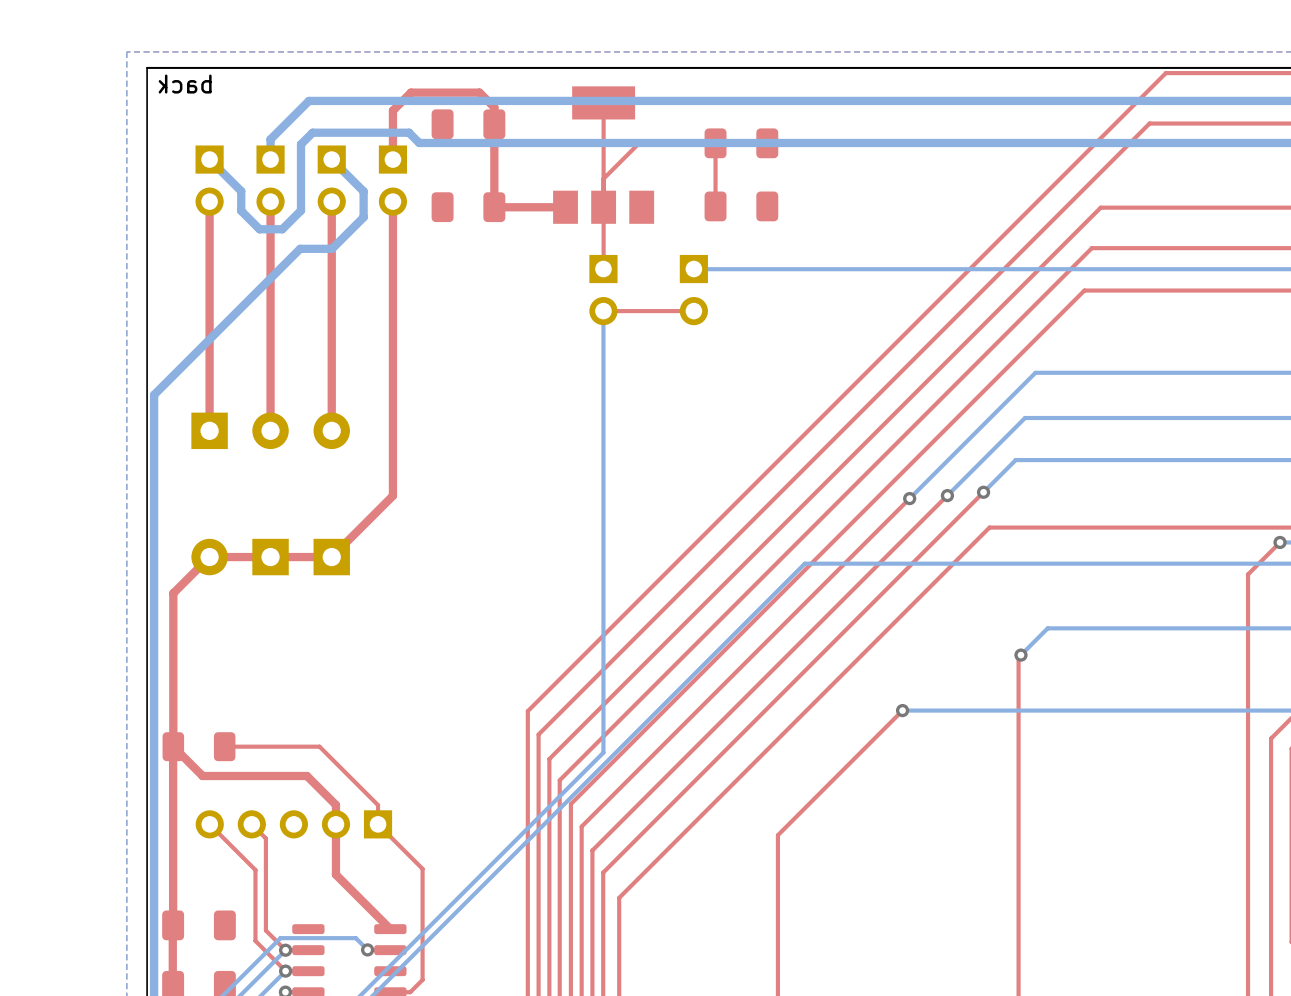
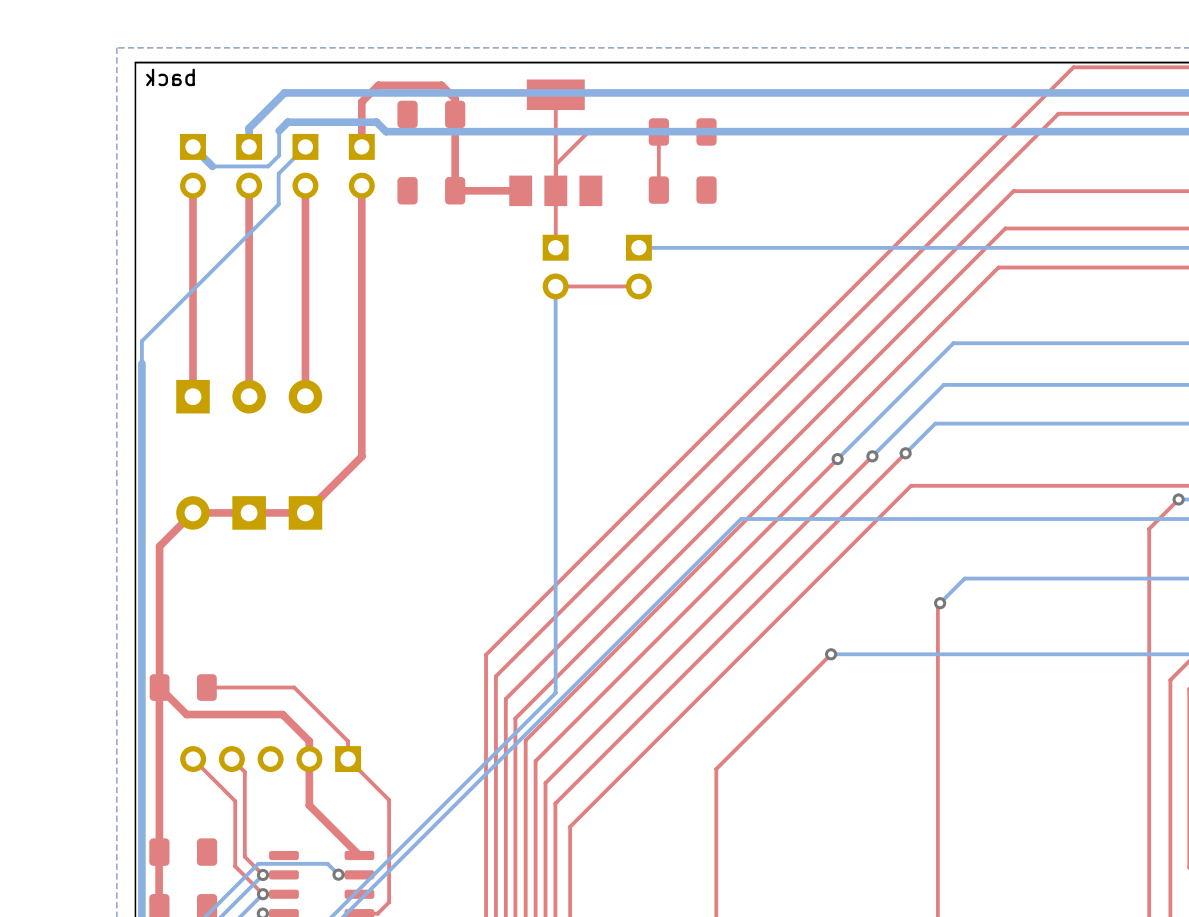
bottom track: (303, 142) (301, 144) (301, 210) (282, 229) (259, 229) (241, 210) (241, 191) (230, 180) -> (279, 130) (279, 155) (268, 166) (212, 166)
bottom track: (331, 159) (363, 191) (363, 217) (332, 248) (300, 248) (154, 394) -> (305, 146) (278, 173) (278, 204) (141, 341) (141, 363)

